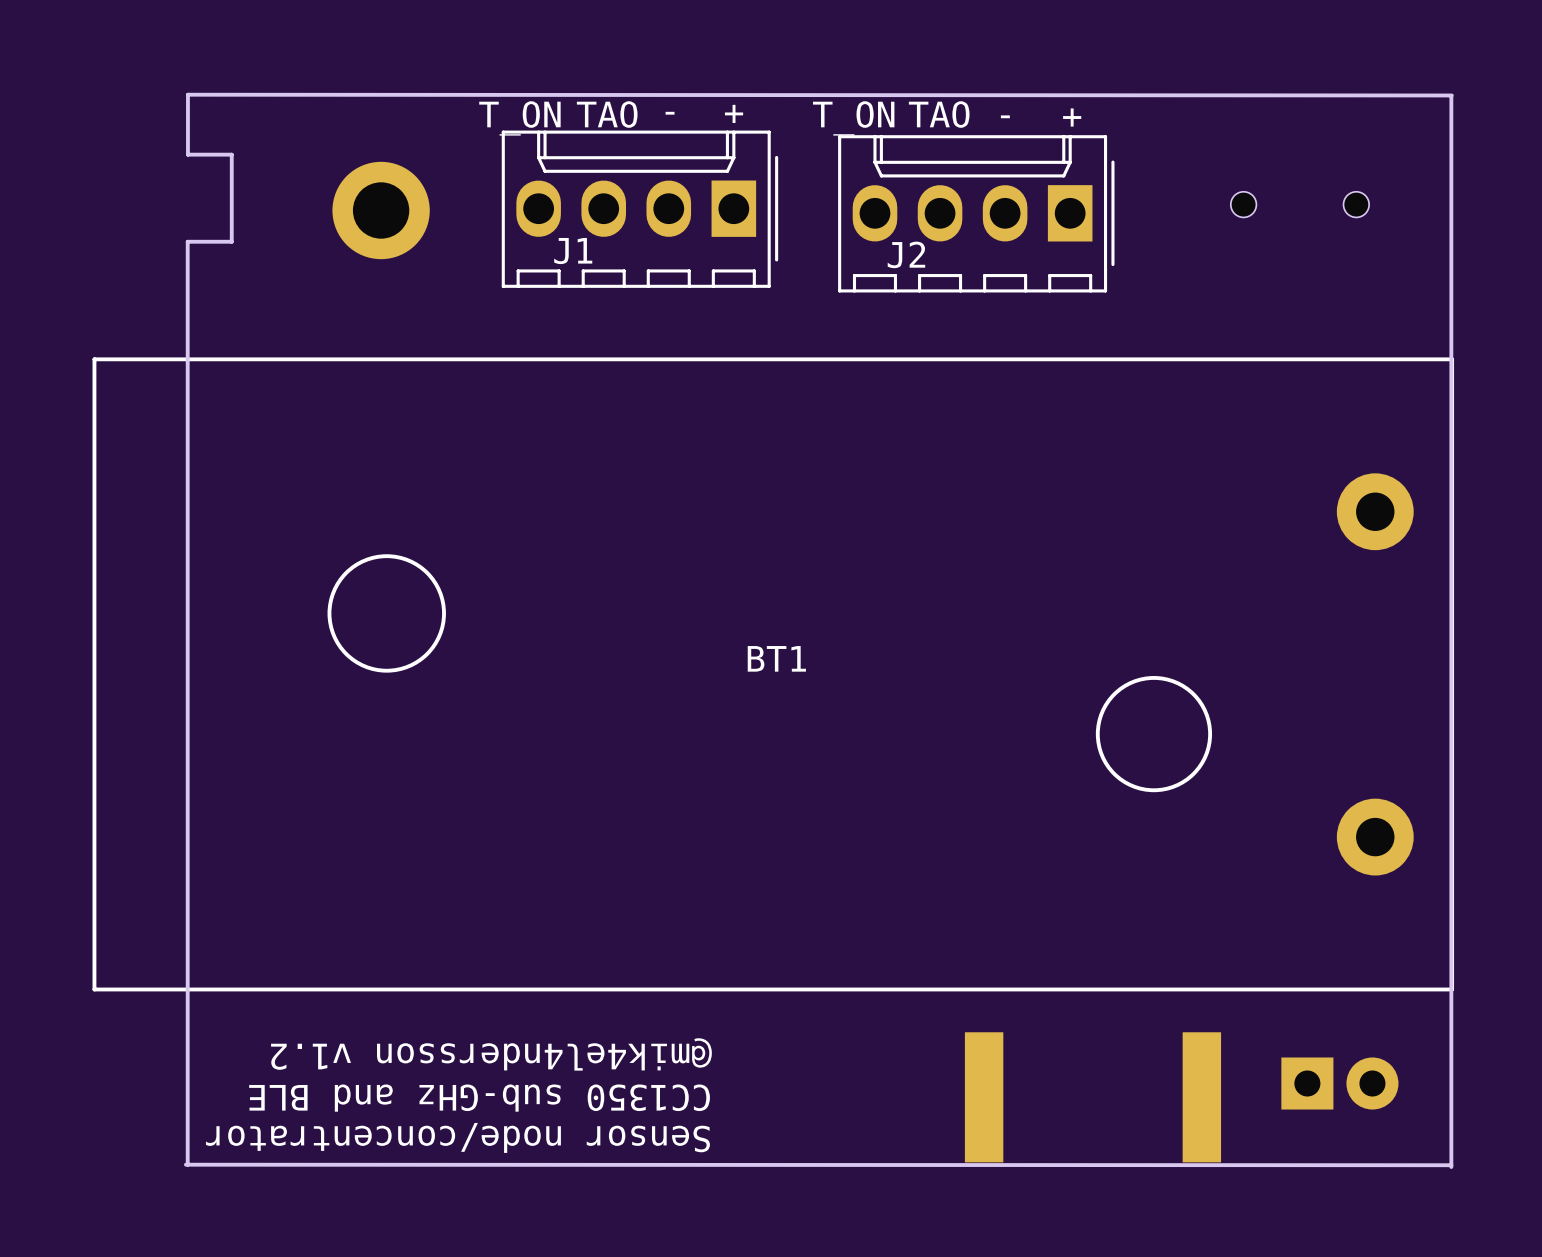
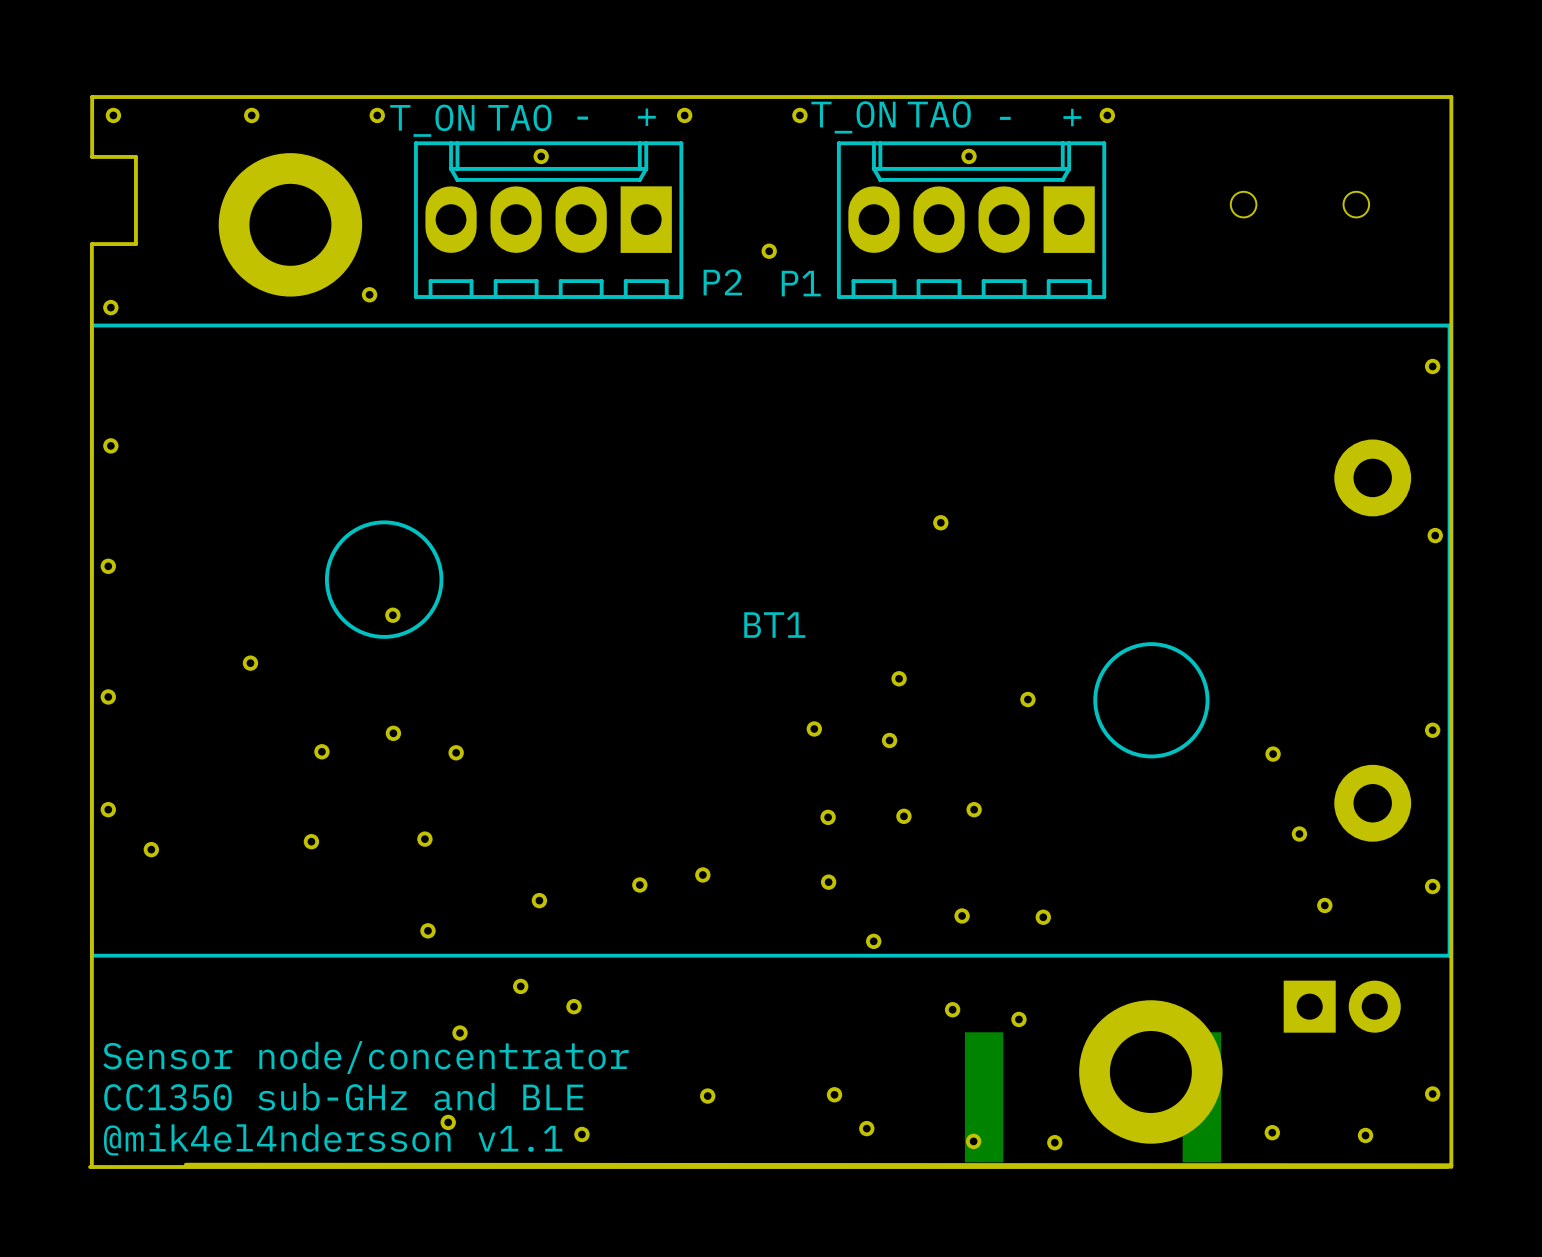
board edge: (1451, 95) (187, 94) (187, 154) (231, 154) (231, 241) (187, 241) (187, 1164) -> none
board edge: none -> (1451, 97) (92, 97) (92, 156) (135, 156) (135, 244) (91, 244) (91, 1167)
text position: - (670, 113) -> - (582, 118)
text position: + (734, 113) -> + (646, 117)
text position: TAO (607, 114) -> TAO (519, 117)
part: none -> (113, 115)
part: none -> (251, 115)
part: none -> (377, 115)
part: none -> (684, 115)
part: none -> (799, 115)
part: none -> (1107, 115)
text position: T_ON (519, 118) -> T_ON (432, 120)
part: none -> (541, 156)
part: none -> (969, 156)
J1: (639, 209) -> none
part: (381, 210) -> none
J2: (976, 213) -> none
P2: none -> (548, 220)
P1: none -> (971, 220)
part: none -> (290, 224)
part: none -> (769, 251)
part: none -> (369, 294)
part: none -> (110, 307)
part: none -> (1432, 366)
part: none -> (110, 445)
part: none -> (940, 522)
part: none -> (1435, 535)
part: none -> (108, 566)
part: none -> (392, 615)
part: none -> (250, 663)
BT1 position: (773, 674) -> (770, 640)
part: none -> (899, 678)
part: none -> (108, 696)
part: none -> (1027, 699)
part: none -> (814, 728)
part: none -> (1432, 730)
part: none -> (393, 733)
part: none -> (889, 740)
part: none -> (321, 751)
part: none -> (456, 752)
part: none -> (1273, 754)
part: none -> (108, 809)
part: none -> (974, 809)
part: none -> (903, 816)
part: none -> (828, 817)
part: none -> (1299, 834)
part: none -> (424, 839)
part: none -> (311, 841)
part: none -> (151, 849)
part: none -> (702, 874)
part: none -> (828, 882)
part: none -> (639, 884)
part: none -> (1432, 886)
part: none -> (539, 900)
part: none -> (1324, 905)
part: none -> (962, 915)
part: none -> (1043, 917)
part: none -> (427, 930)
part: none -> (873, 941)
part: none -> (520, 986)
part: none -> (573, 1006)
part: none -> (952, 1009)
part: none -> (1018, 1019)
part: none -> (460, 1033)
text: @mik4el4ndersson v1.2 (491, 1054) -> none
part: none -> (1150, 1071)
part position: (1339, 1083) -> (1342, 1006)
part: none -> (834, 1094)
part: none -> (1432, 1094)
part: none -> (707, 1096)
text rotation: 0° (479, 1098) -> 180° (343, 1096)
part: none -> (448, 1122)
part: none -> (866, 1128)
part: none -> (1272, 1132)
part: none -> (581, 1134)
part: none -> (1365, 1135)
text rotation: 0° (457, 1137) -> 180° (365, 1057)
text: none -> @mik4el4ndersson v1.1 (333, 1139)
part: none -> (973, 1141)
part: none -> (1054, 1142)
board edge: none -> (1448, 1167) (90, 1167)

